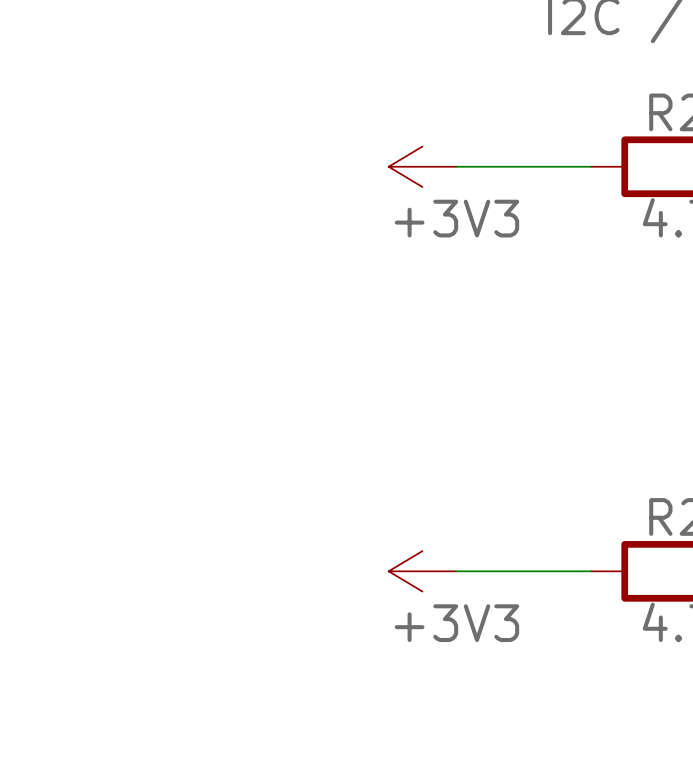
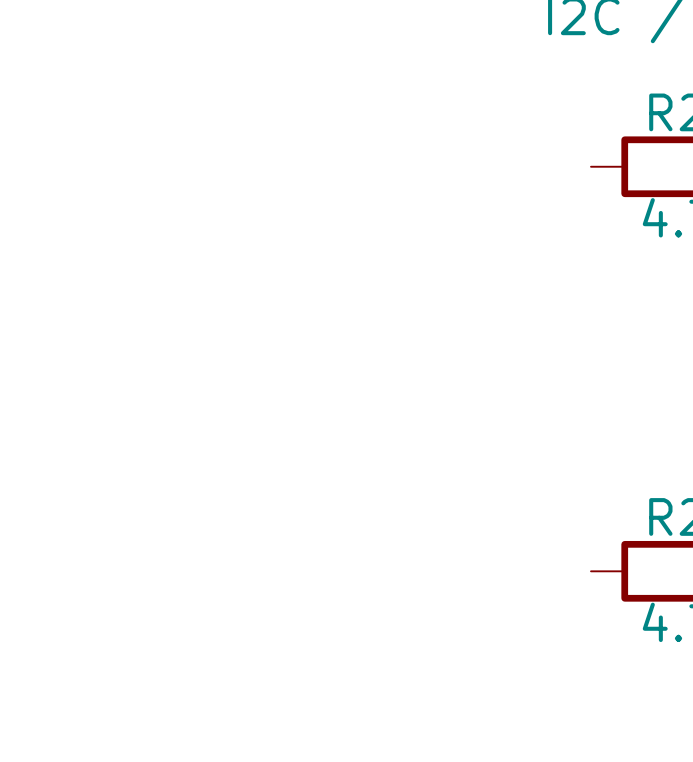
power symbol: +3V3 (422, 166) -> none
wire: (456, 166) (591, 166) -> none
power symbol: +3V3 (422, 571) -> none
wire: (456, 571) (591, 571) -> none

